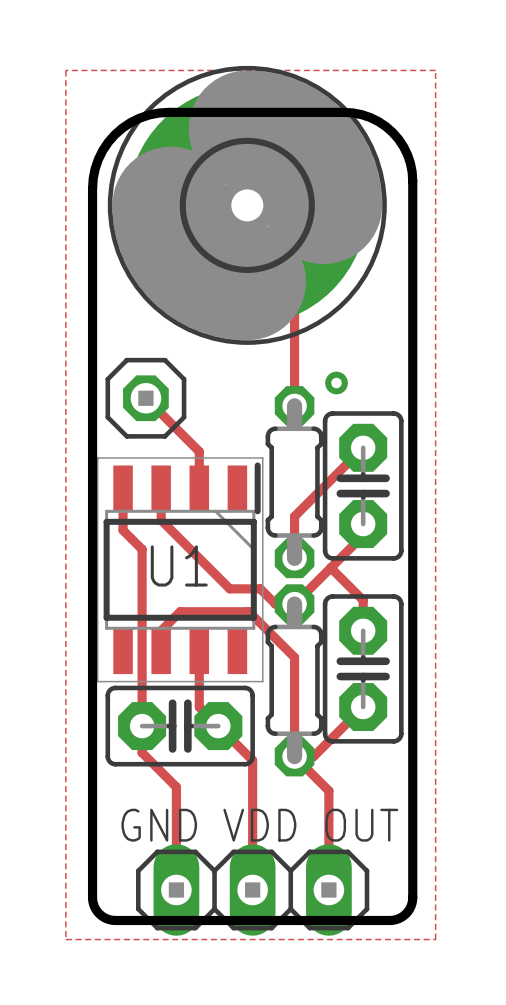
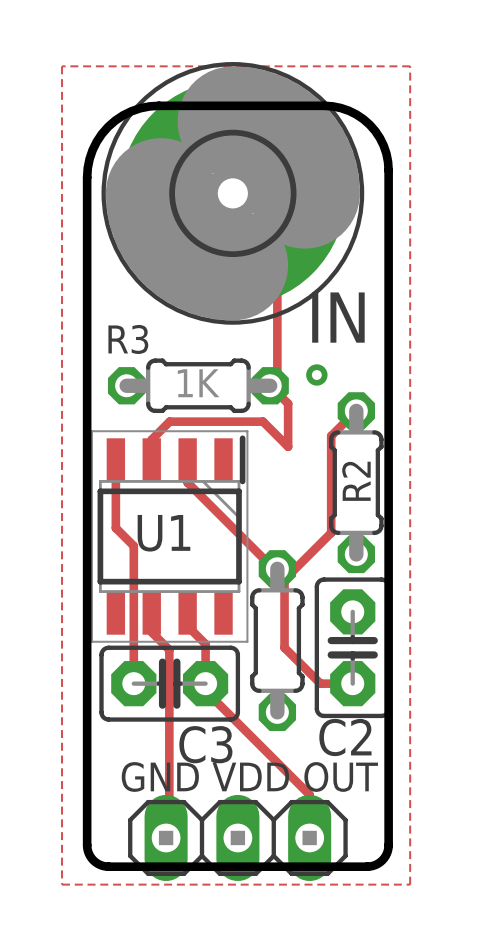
text: none -> IN (338, 317)
via position: (336, 383) -> (316, 374)
track: (145, 398) (199, 451) (199, 488) -> (284, 579) (187, 482) (187, 459)
part: (145, 398) -> none
R3: none -> 1K (198, 385)
track: none -> (356, 410) (331, 436) (331, 532) (284, 579)
track: (363, 447) (294, 516) (294, 558) -> none
part: (294, 482) -> none
part: (363, 485) -> none
track: (161, 488) (161, 520) (229, 588) (260, 588) (275, 604) (294, 604) (363, 535) (363, 524) -> (151, 459) (151, 439) (169, 421) (263, 421) (288, 446) (288, 403) (270, 385)
R2: none -> (356, 482)
track: (123, 530) (142, 549) (142, 579) -> (115, 499) (115, 528) (133, 546)
track: (330, 567) (363, 600) (363, 630) -> none
track: none -> (284, 579) (284, 647) (320, 683) (352, 683)
track: (161, 651) (161, 630) (180, 611) (248, 611) (294, 657) (294, 756) -> none
track: (199, 665) (199, 707) (252, 760) (252, 889) -> (187, 626) (205, 644) (205, 690) (309, 794)
C2 position: (363, 668) -> (352, 647)
track: (363, 707) (313, 756) (294, 756) -> none
track: (142, 726) (142, 752) (176, 787) (176, 889) -> (151, 613) (151, 632) (169, 649) (169, 836) (166, 837)
track: (294, 756) (328, 790) (328, 844) -> none
C2 name: none -> C2 (345, 737)
C3 name: none -> C3 (205, 744)

